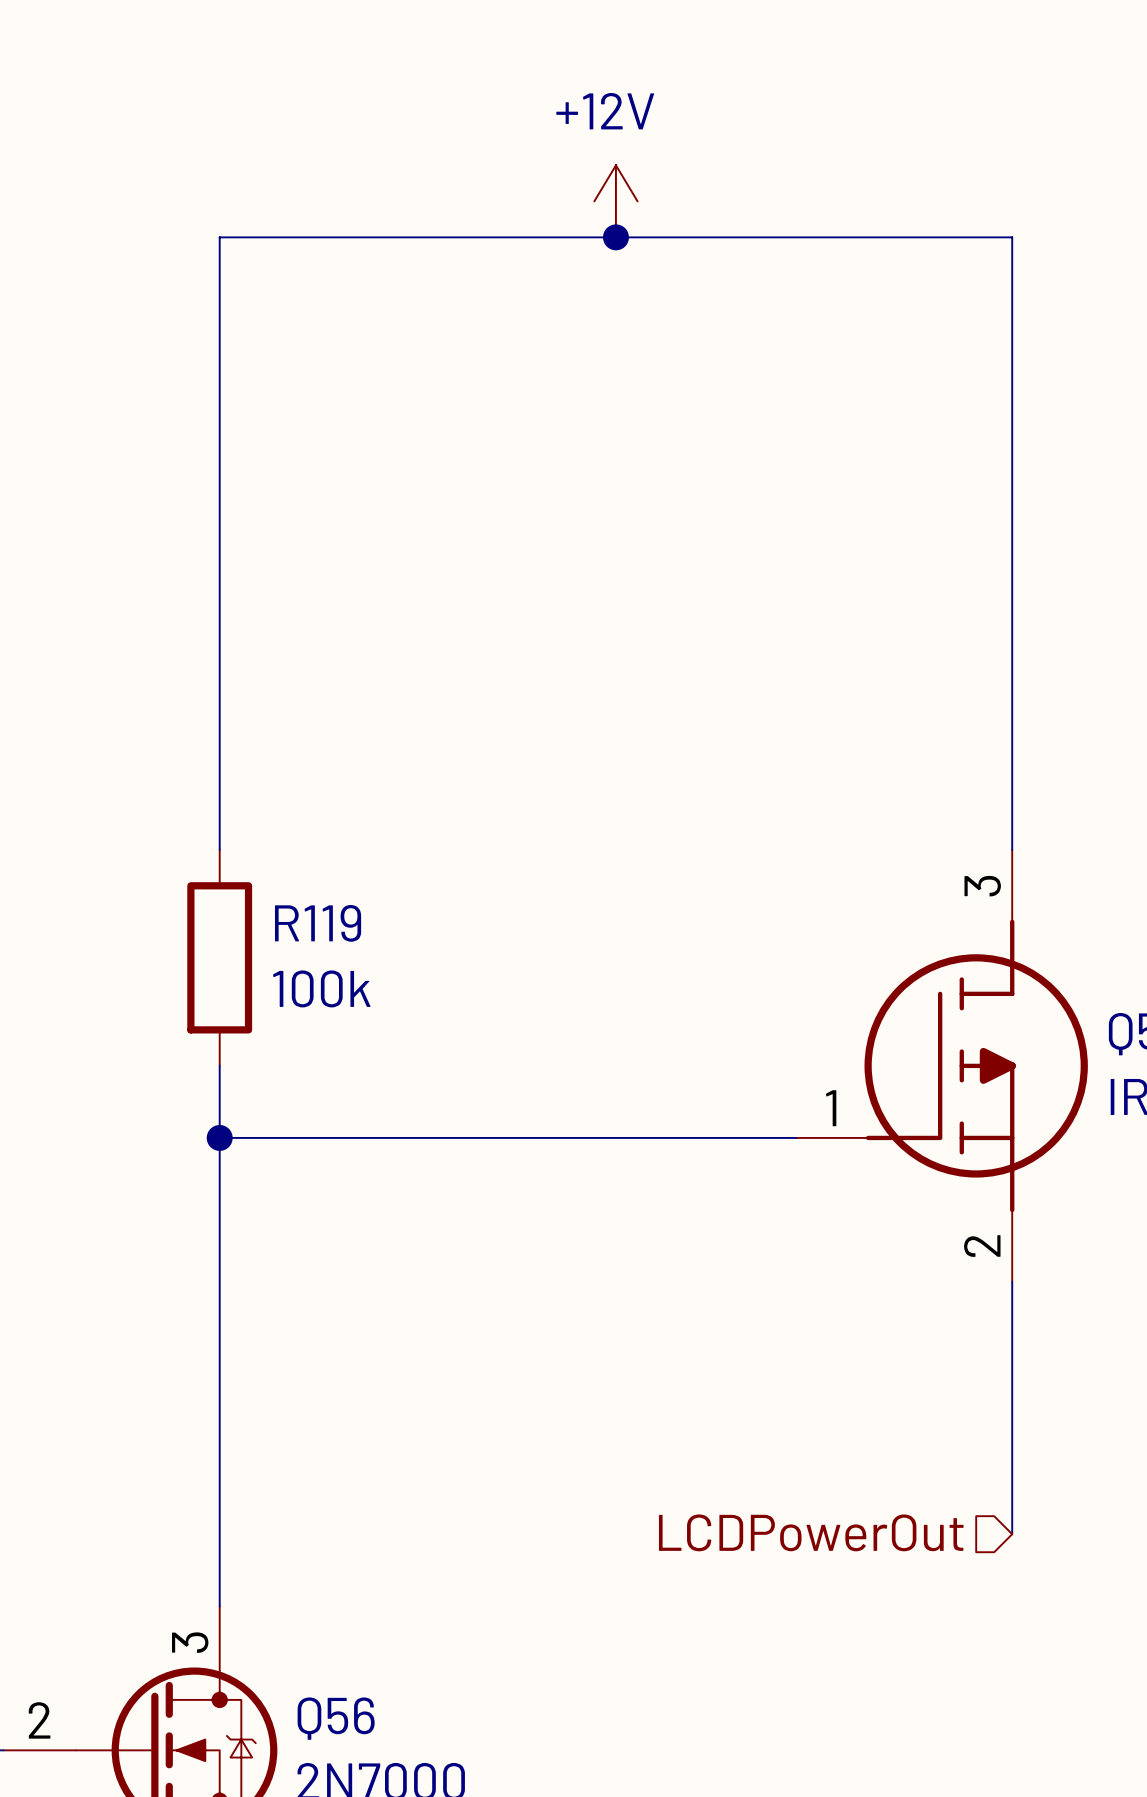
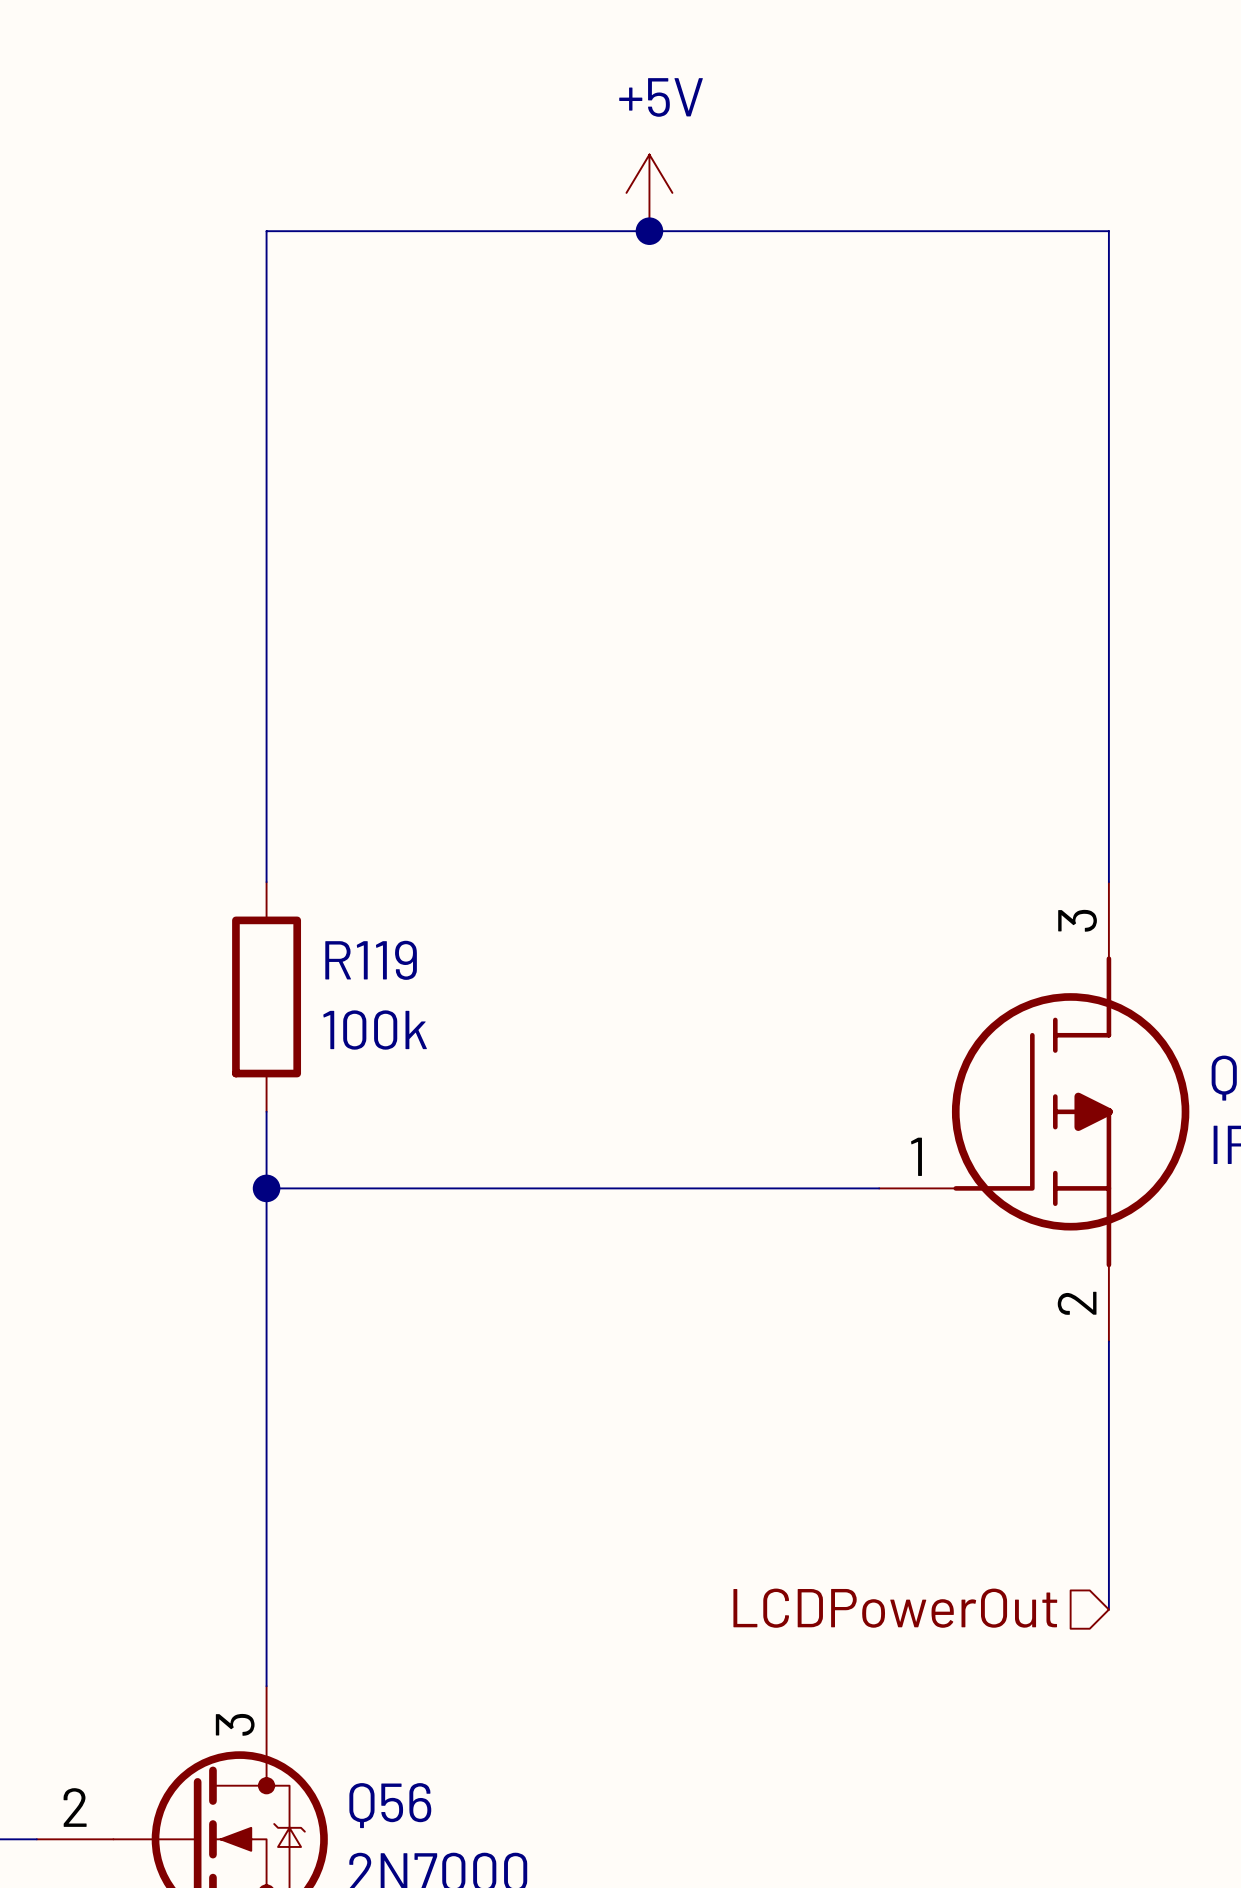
power symbol: none -> +5V (649, 192)
power symbol: +12V (615, 201) -> none
junction position: (615, 237) -> (649, 231)

